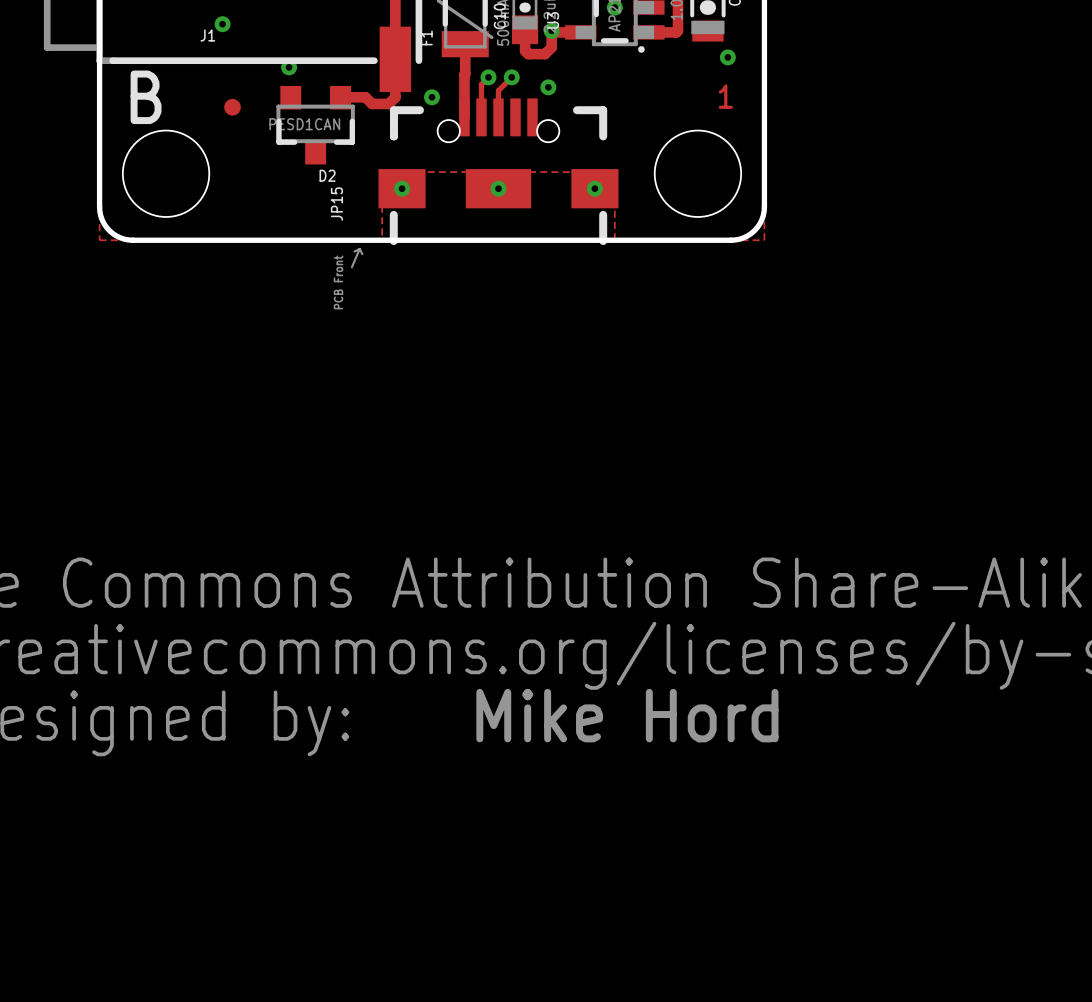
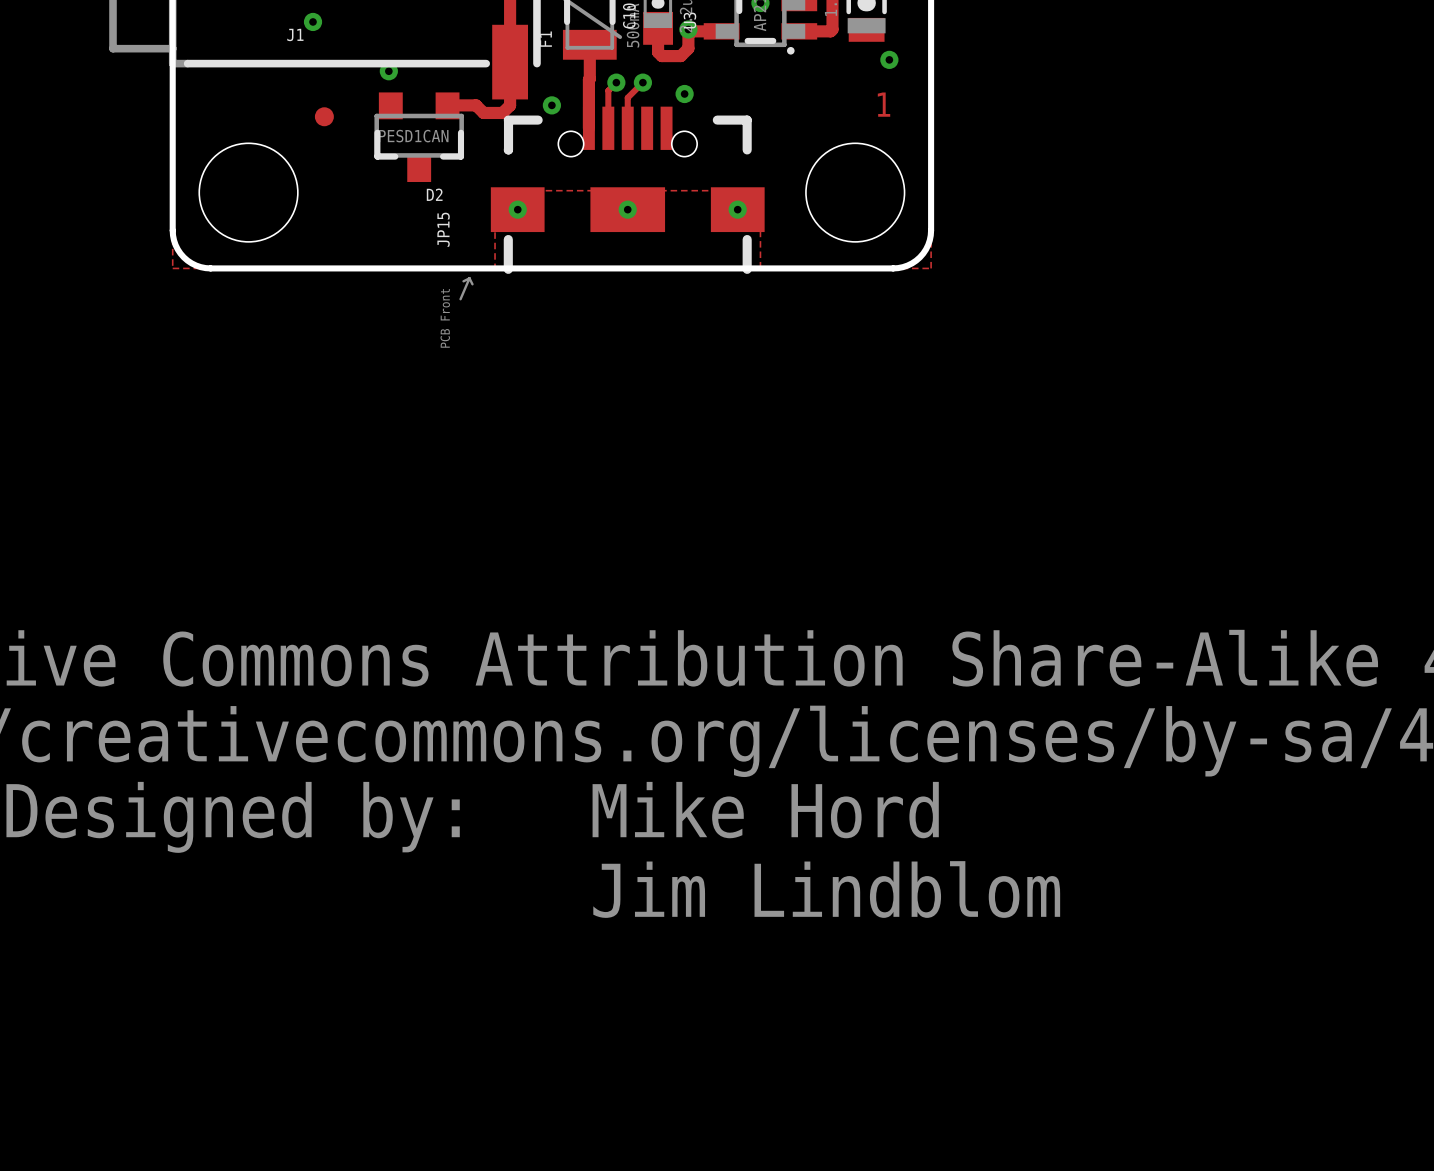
text: B (146, 97) -> none
text: Mike Hord (627, 715) -> Jim Lindblom (826, 889)

